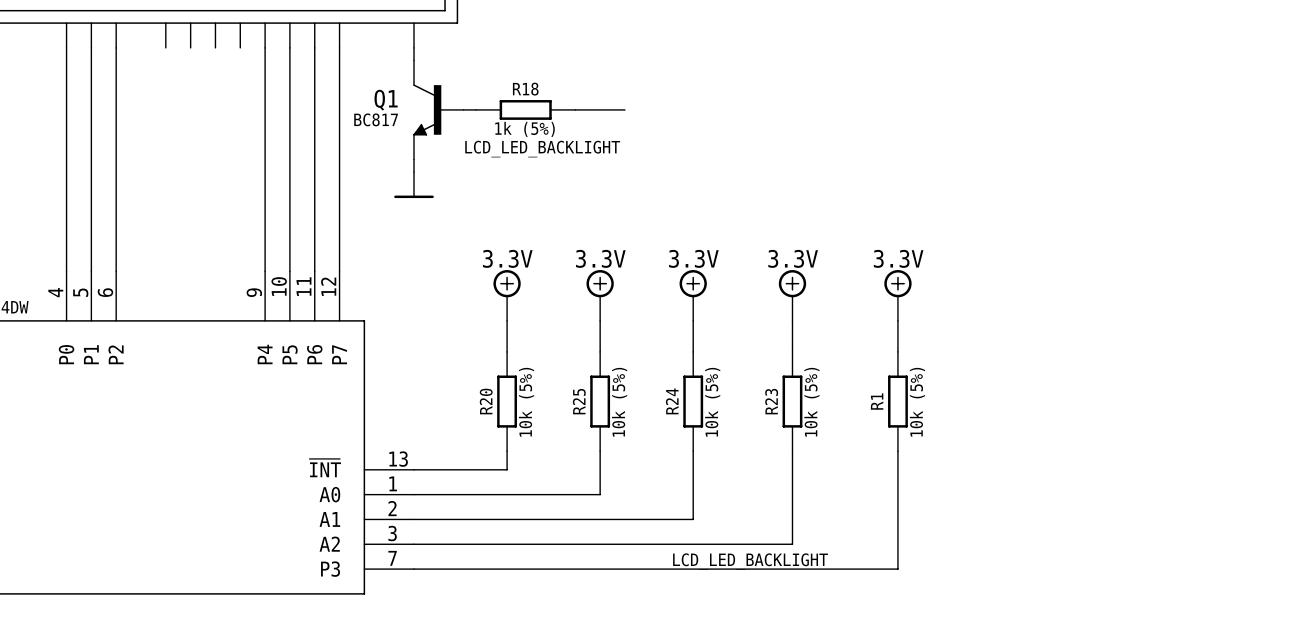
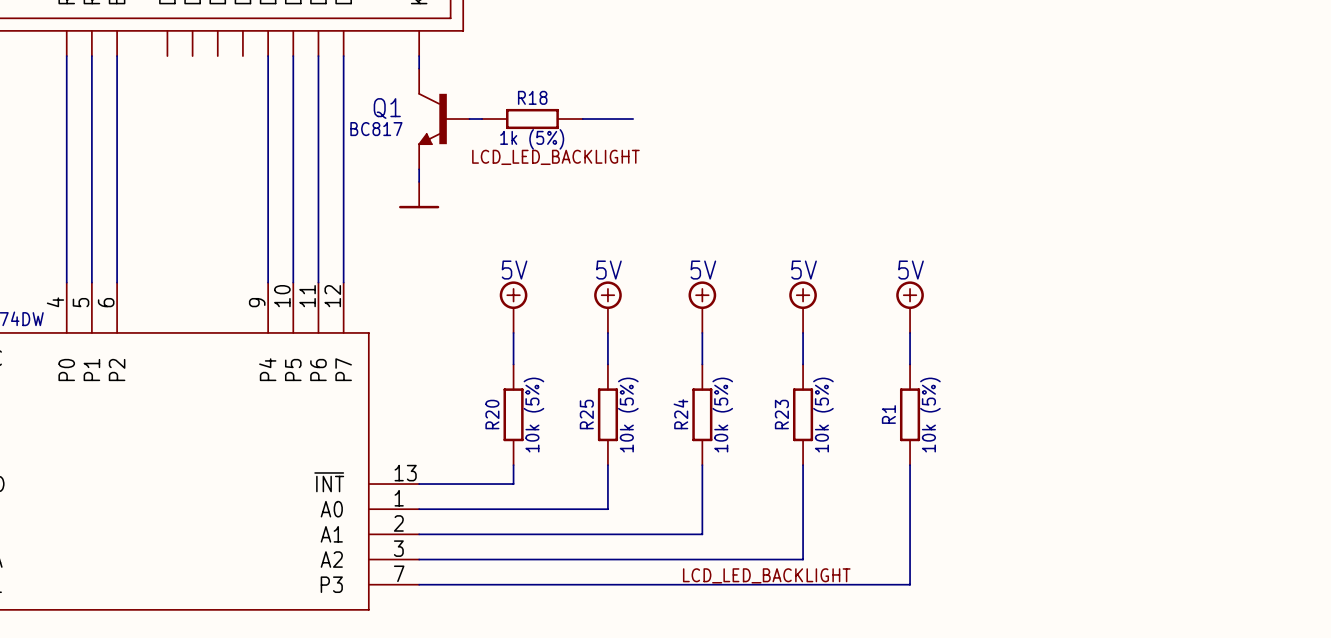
power symbol: 3.3V (507, 295) -> 5V (513, 307)
power symbol: 3.3V (600, 295) -> 5V (607, 307)
power symbol: 3.3V (693, 295) -> 5V (702, 307)
power symbol: 3.3V (792, 295) -> 5V (803, 307)
power symbol: 3.3V (897, 295) -> 5V (910, 307)

